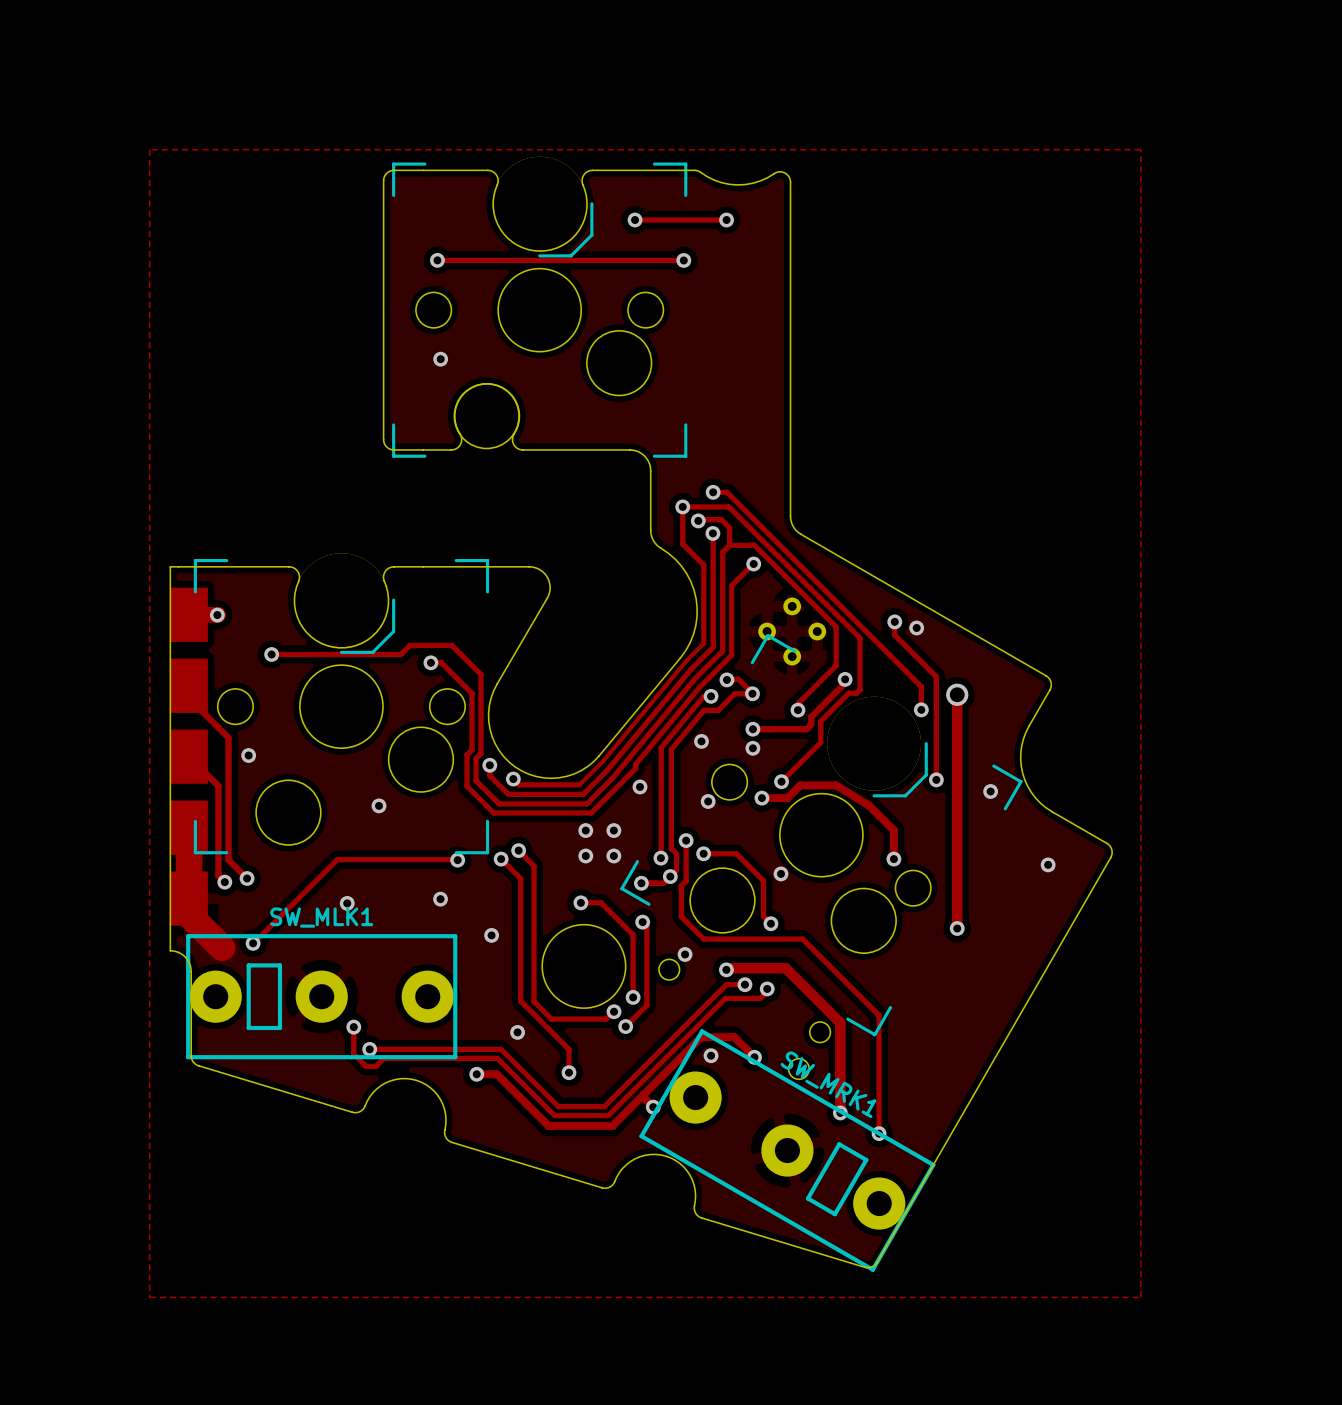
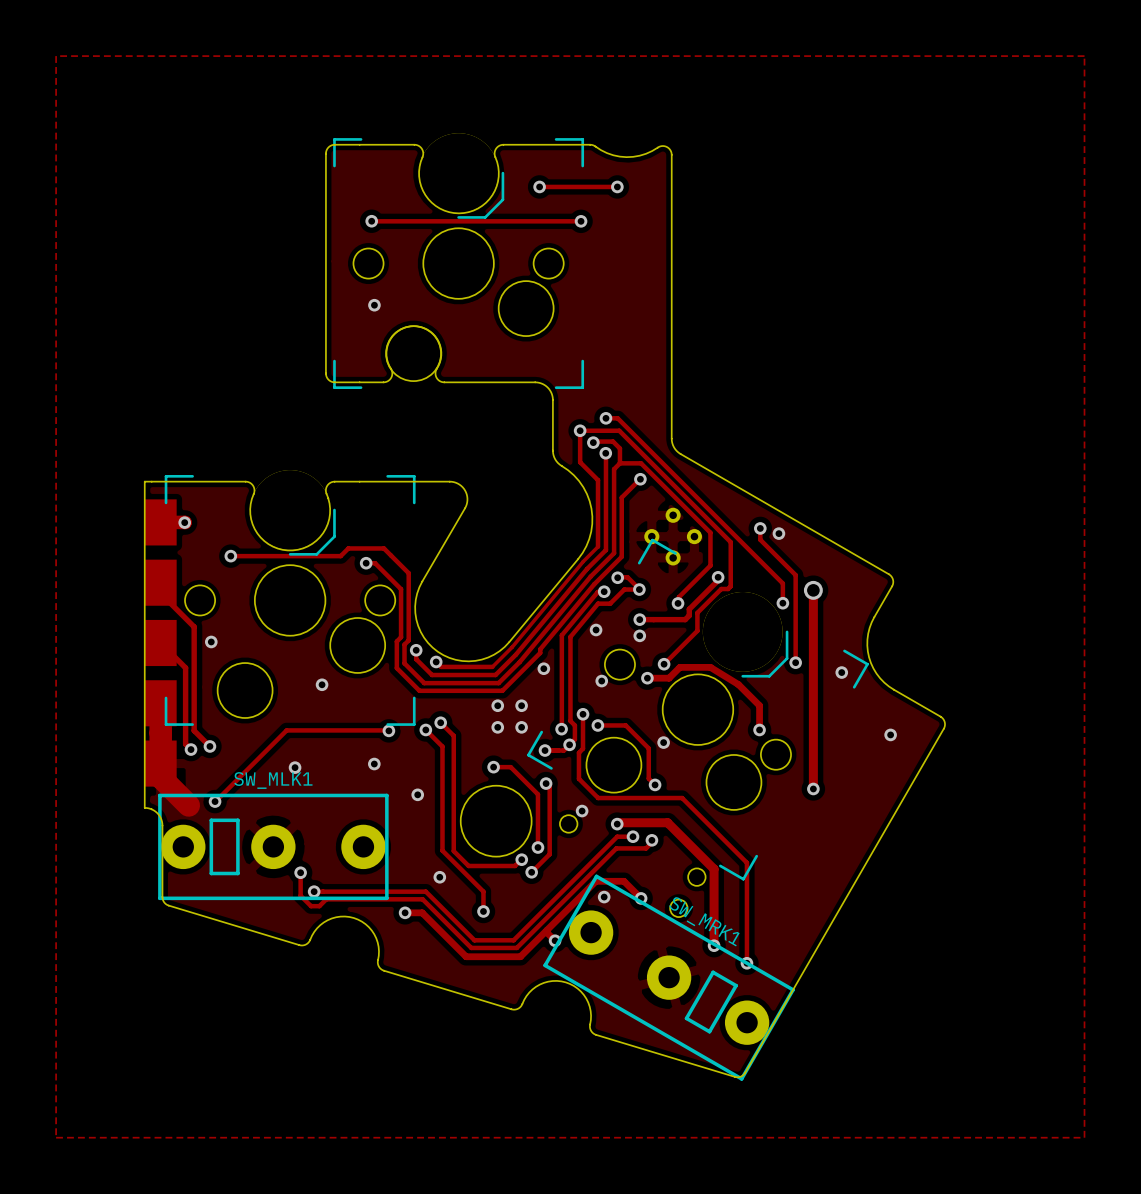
zone outline: (149, 149) (149, 1297) (1140, 1297) (1140, 149) (149, 149) -> (56, 56) (56, 1137) (1084, 1137) (1084, 56) (56, 56)

